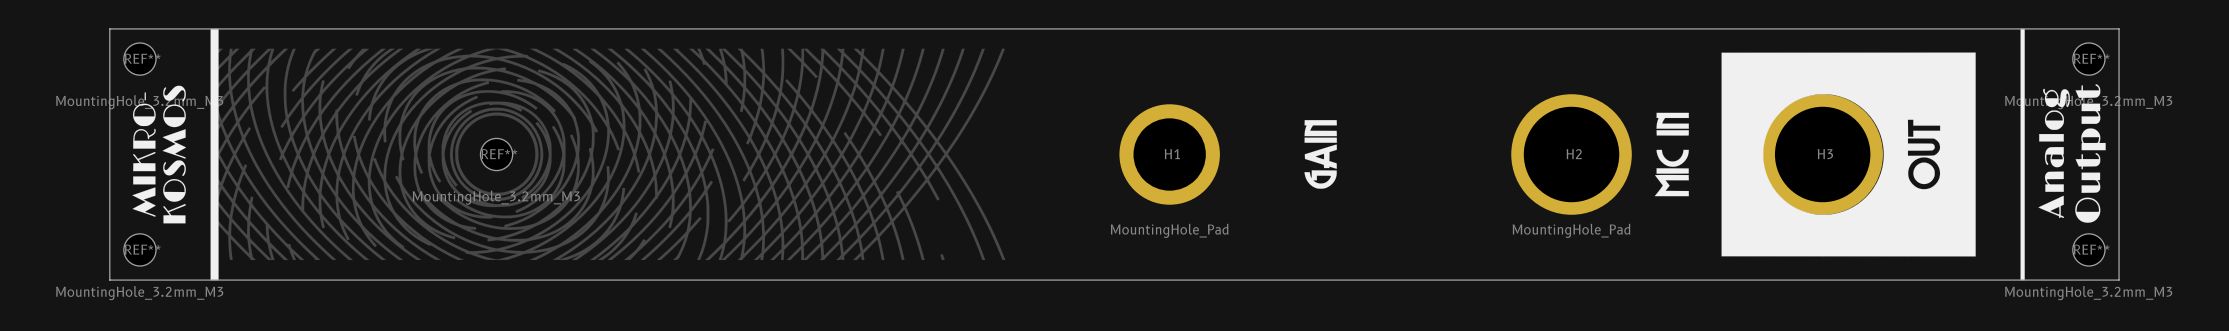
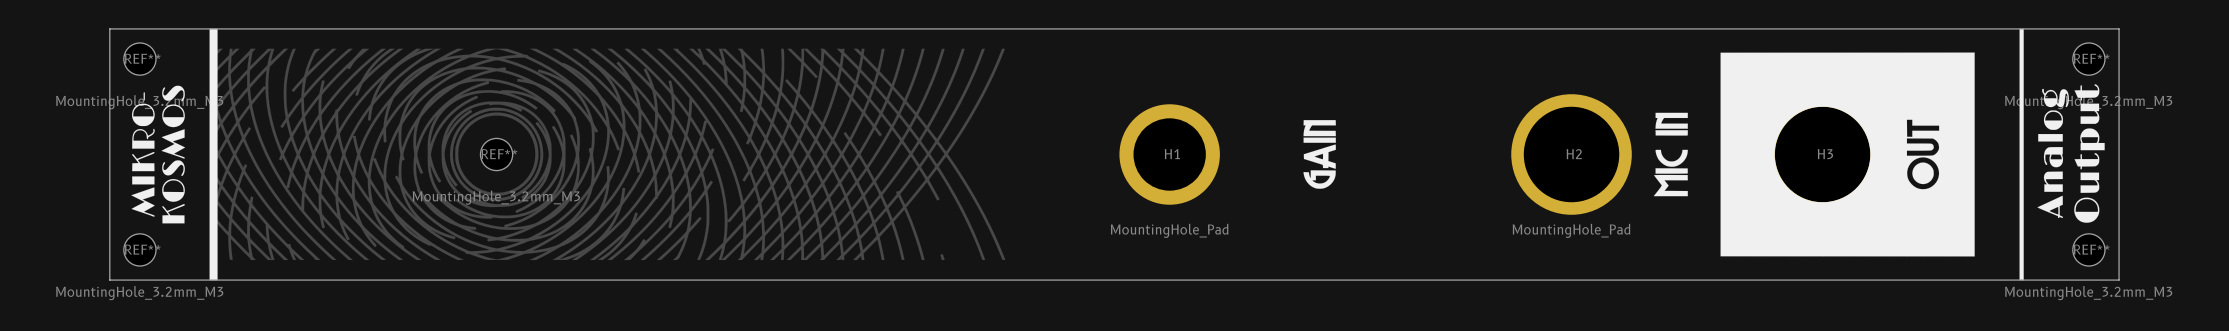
drawing shape: [132, 28, 2106, 281] -> [131, 28, 2105, 281]

